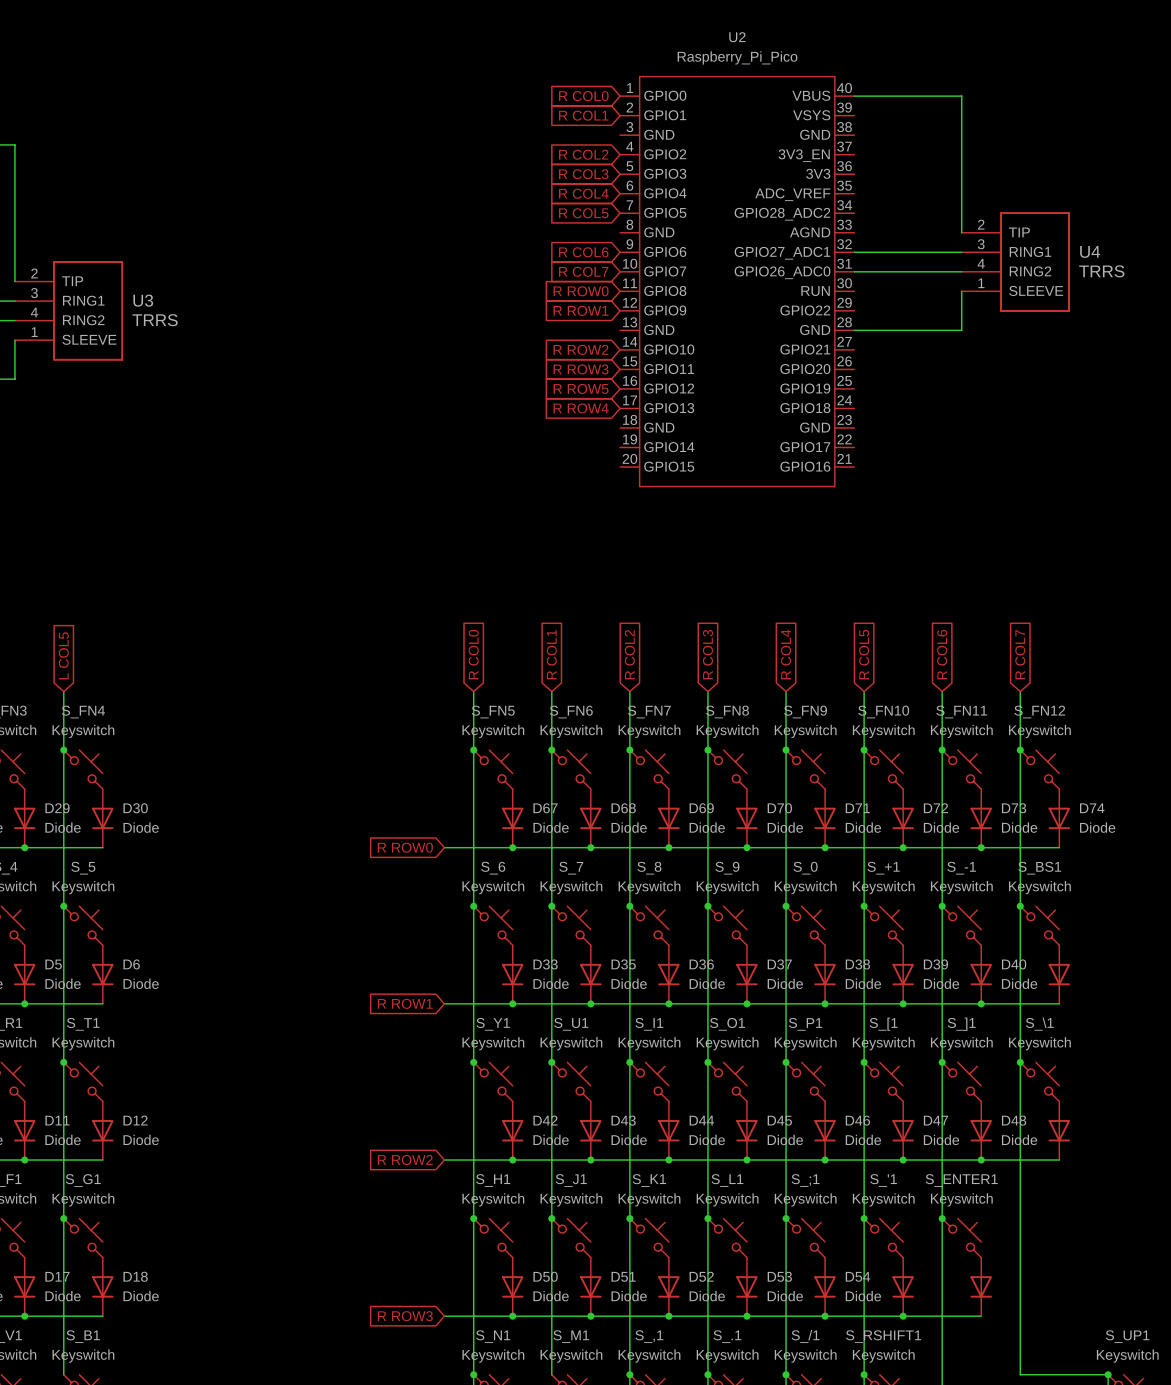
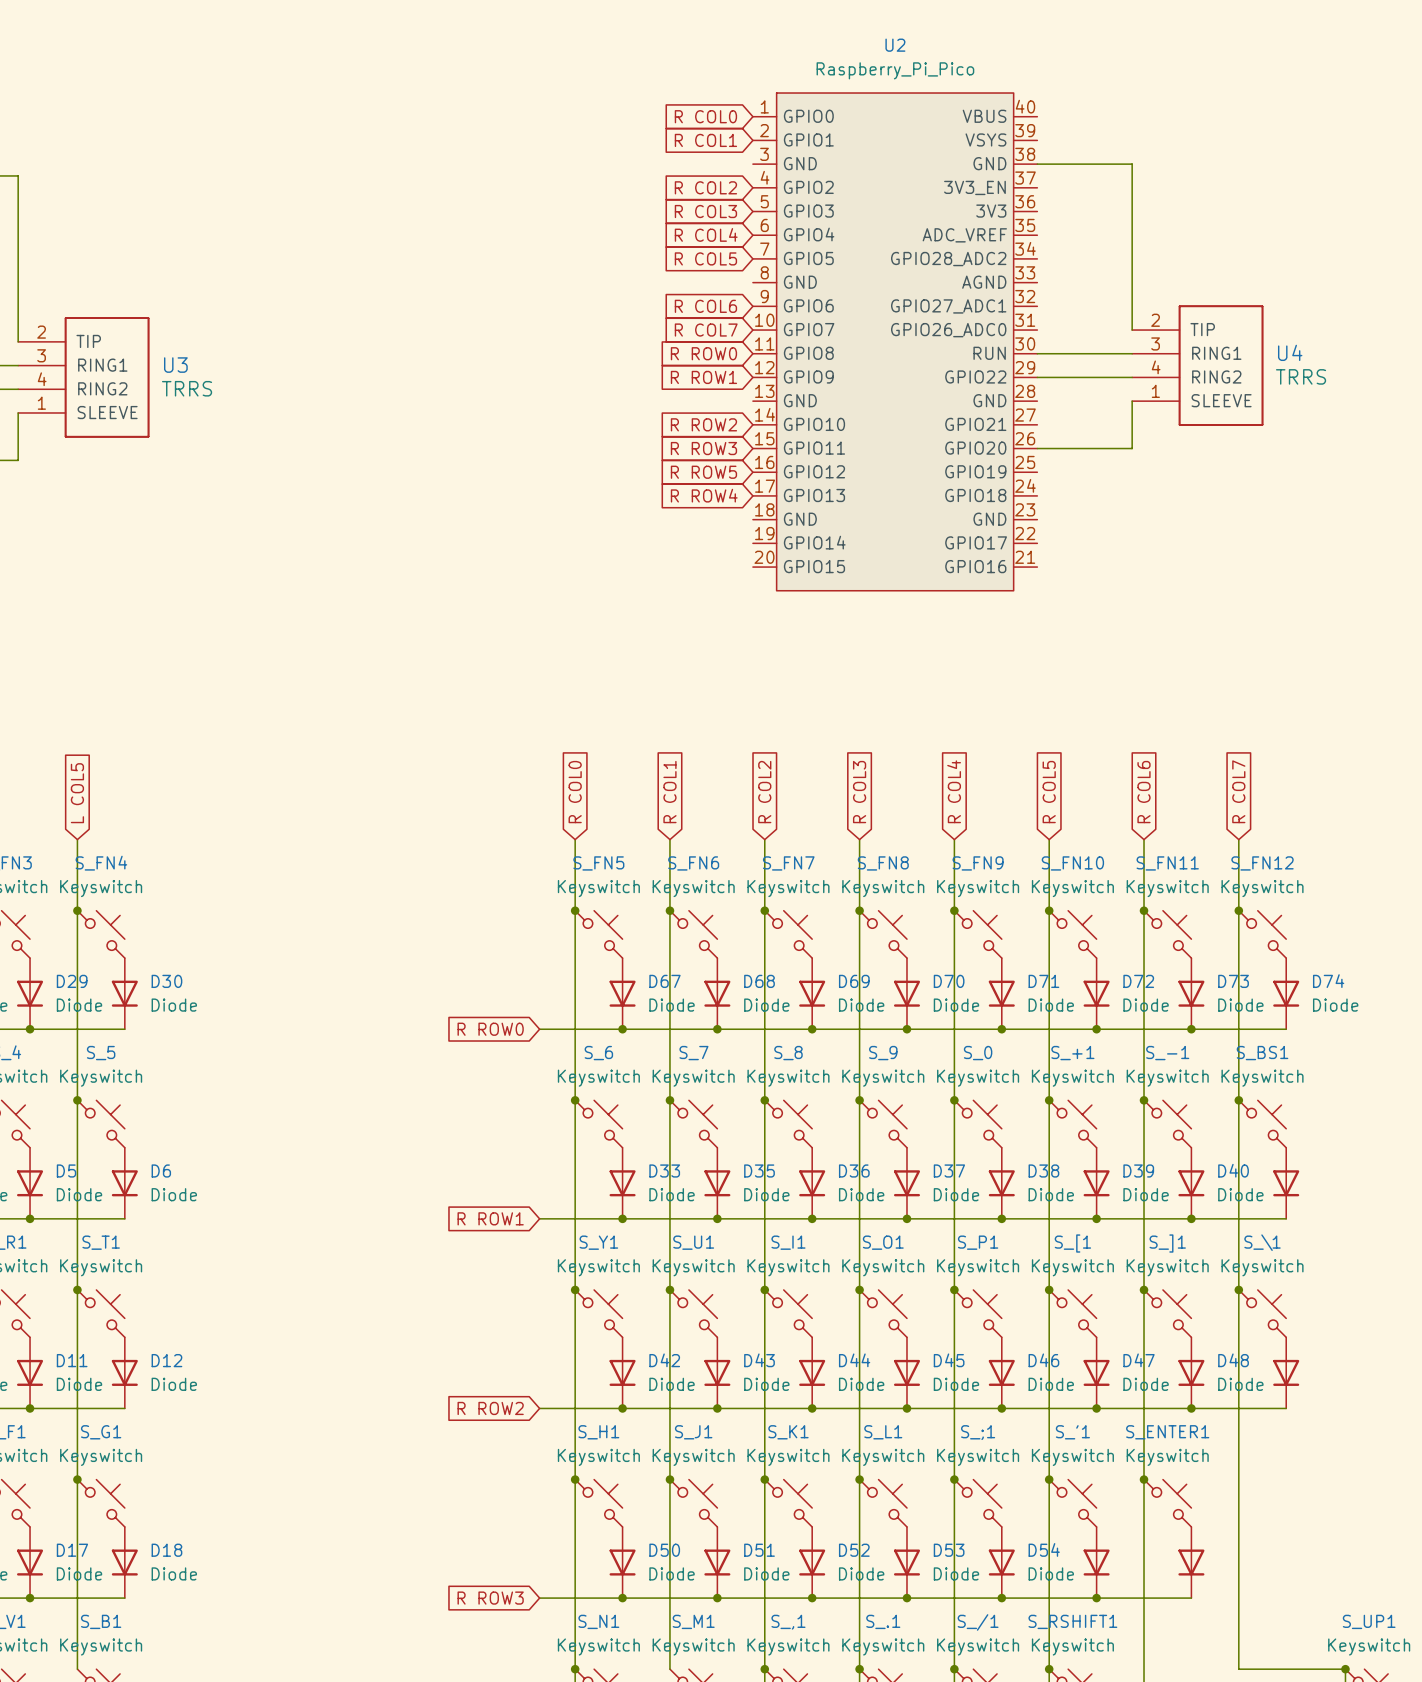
wire: (854, 96) (961, 96) (961, 232) -> none
wire: none -> (1037, 164) (1132, 164) (1132, 330)
wire: (854, 252) (961, 252) -> none
U4 position: (1015, 262) -> (1197, 365)
wire: (854, 271) (961, 271) -> none
wire: none -> (1037, 353) (1132, 353)
wire: (961, 291) (961, 330) (854, 330) -> none
wire: none -> (1037, 377) (1132, 377)
wire: none -> (1132, 401) (1132, 448) (1037, 448)

